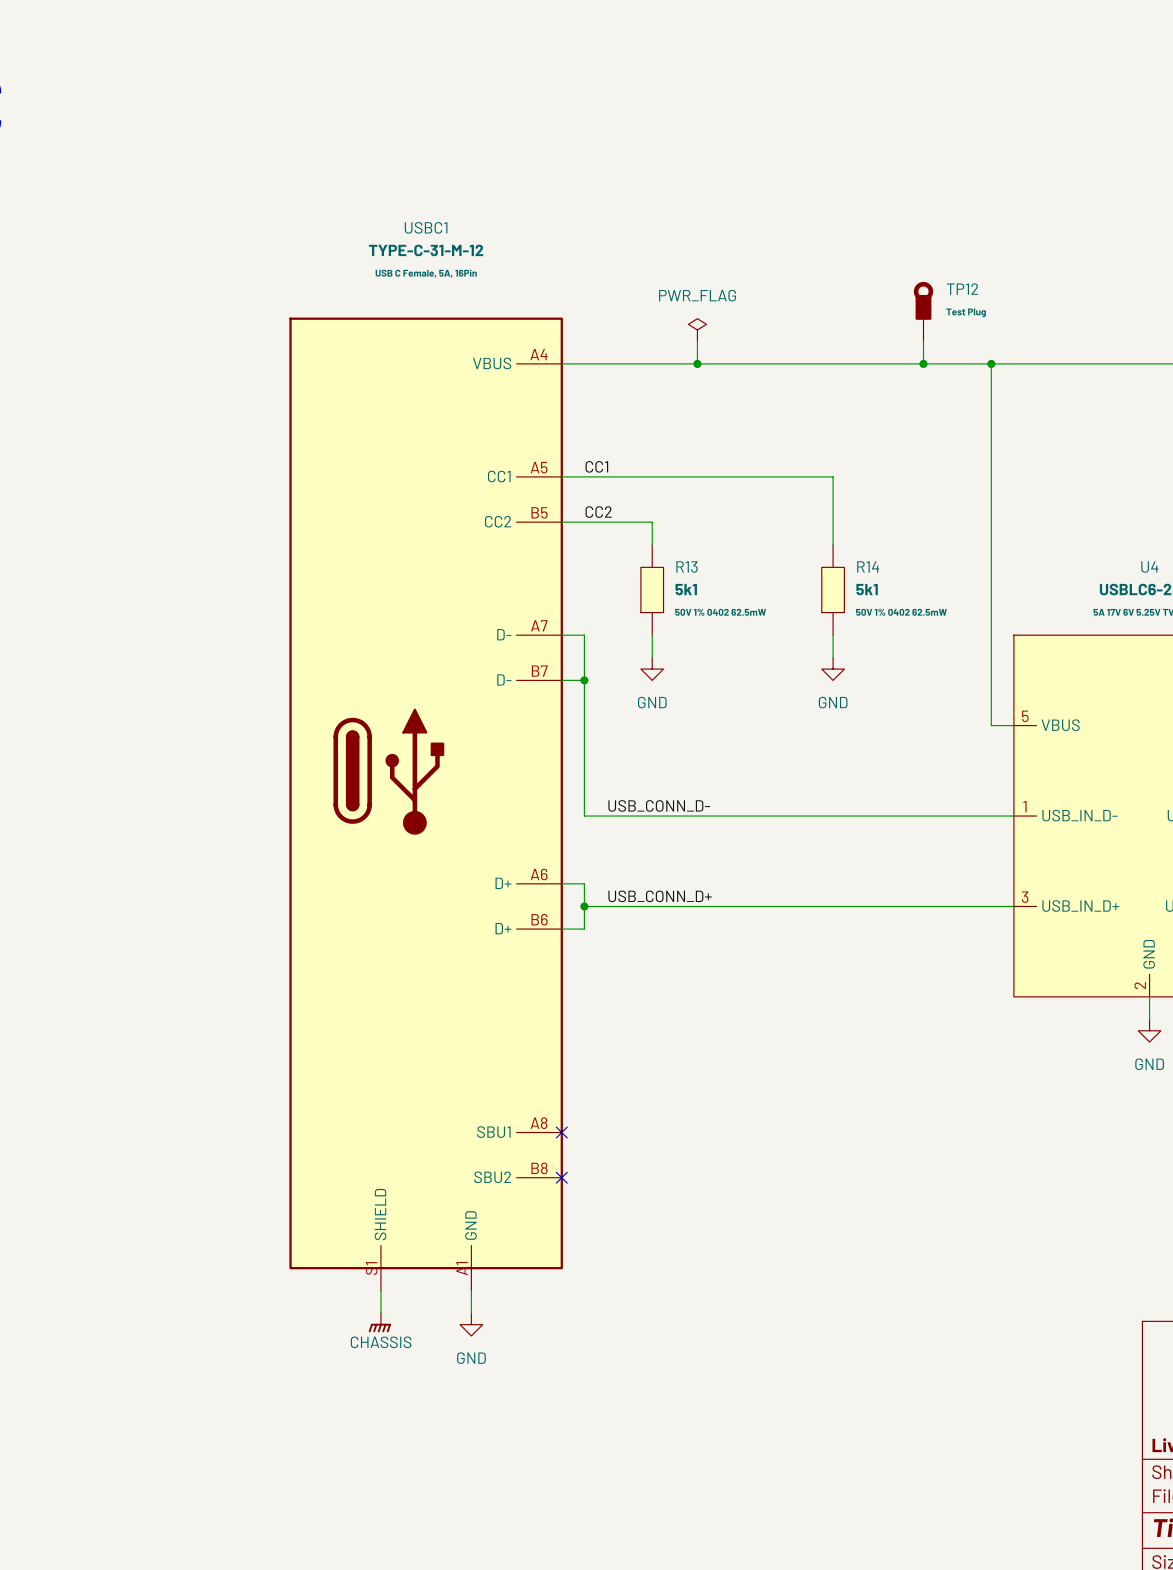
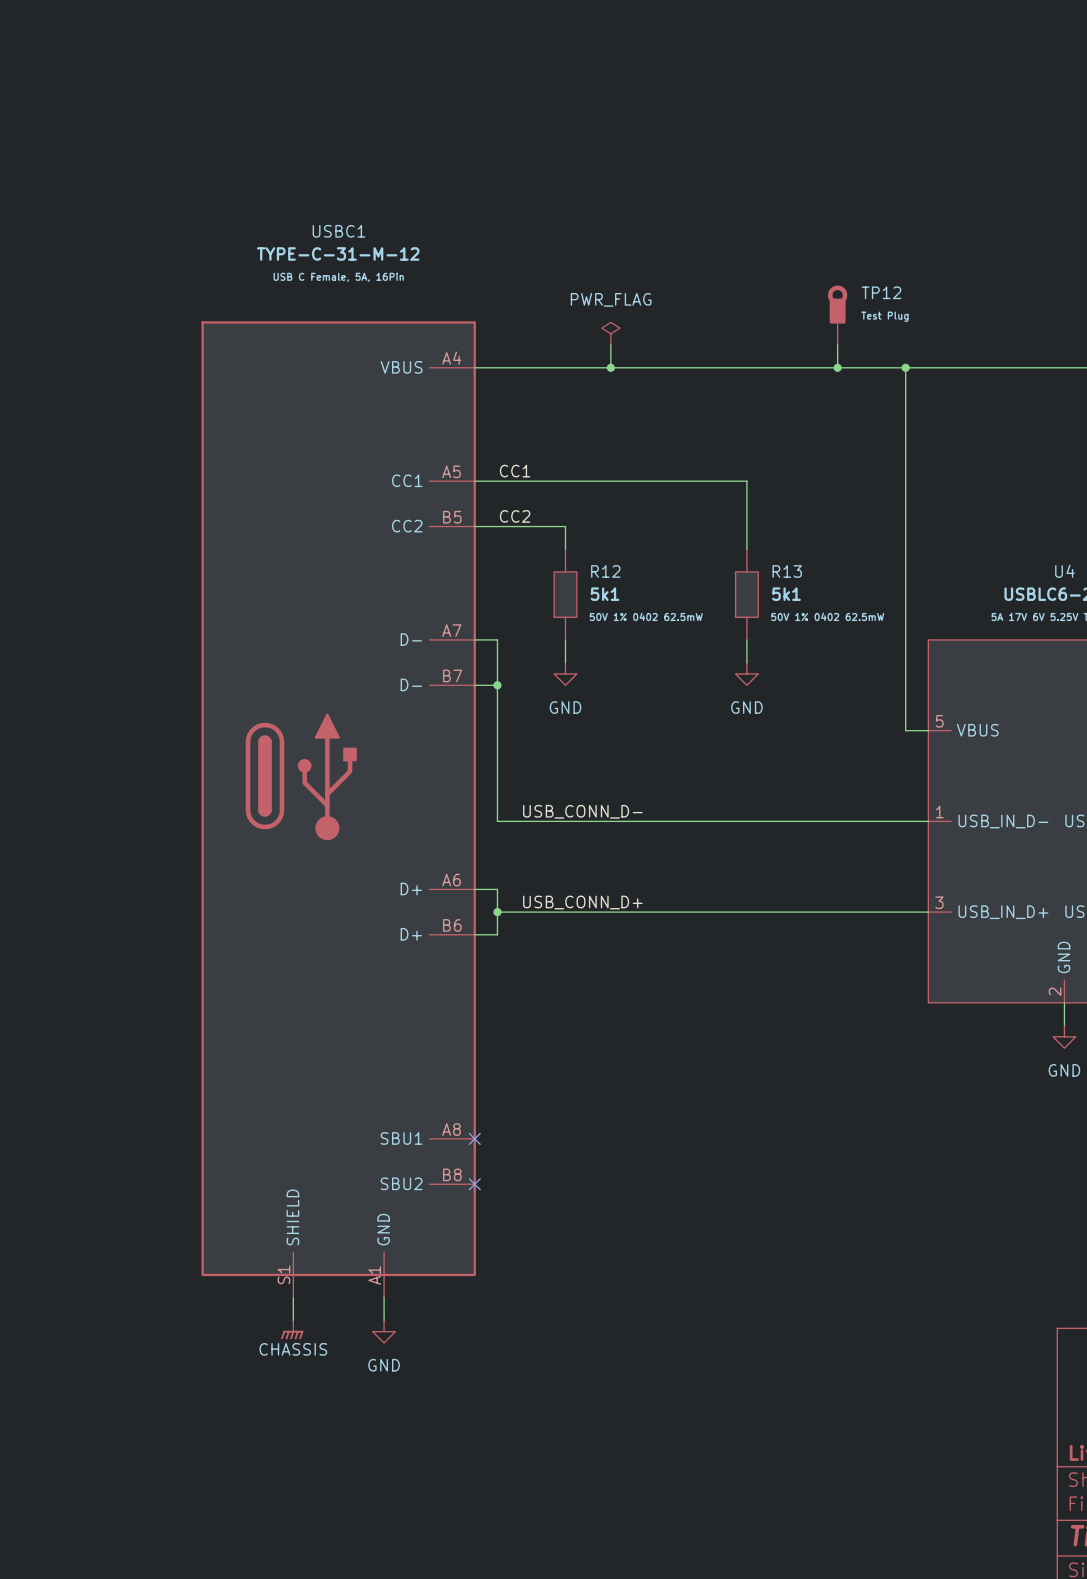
R14 name: R14 (868, 566) -> R13 (787, 571)
R13 name: R13 (686, 567) -> R12 (605, 571)

